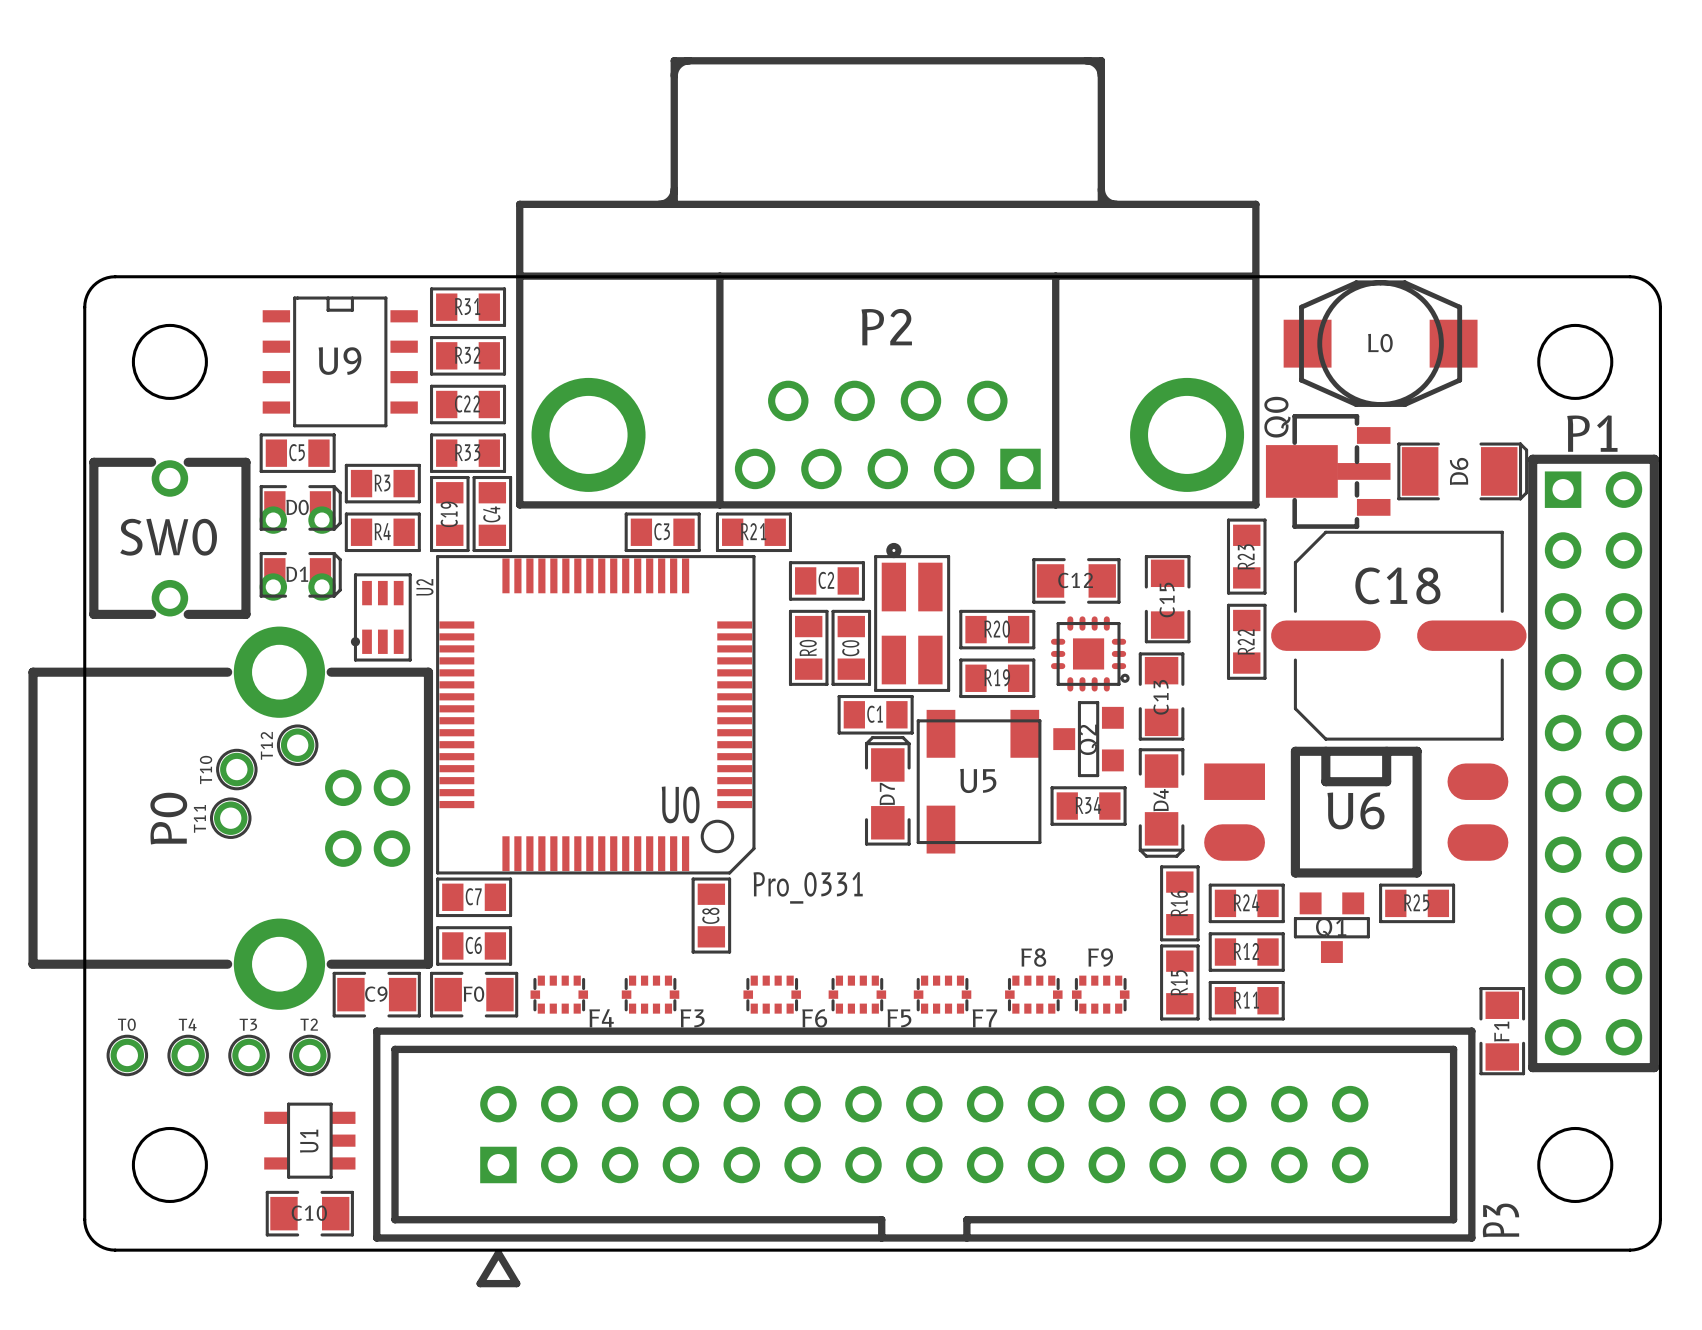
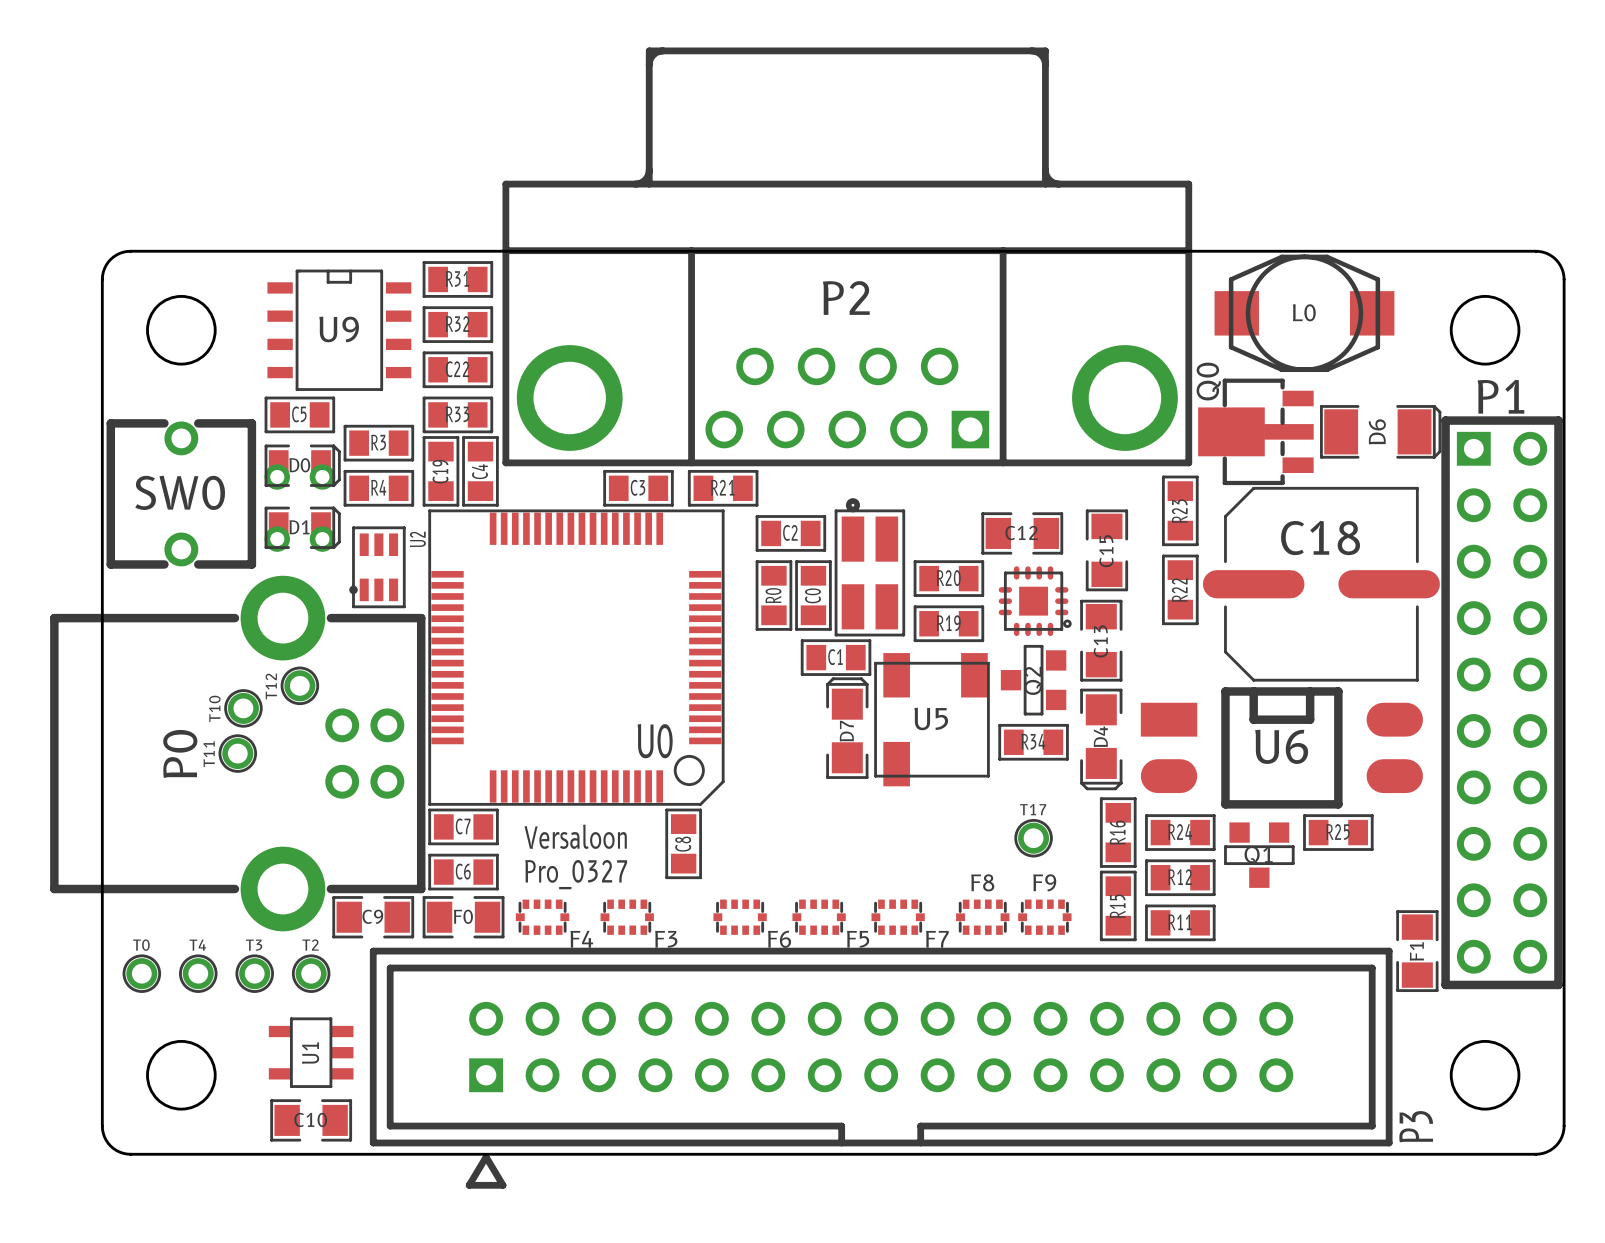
text: Pro_0331 (808, 887) -> none
text: none -> Versaloon (575, 836)
T17: none -> (1033, 838)
text: none -> Pro_0327 (576, 874)

